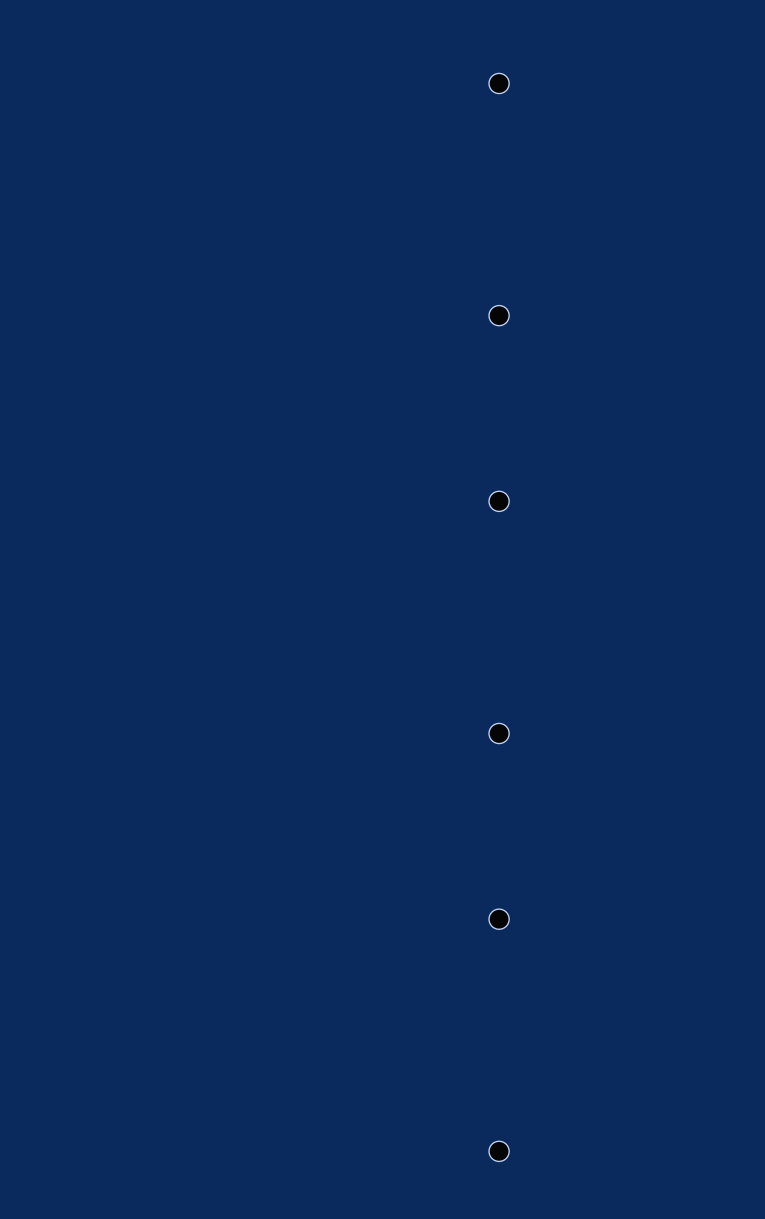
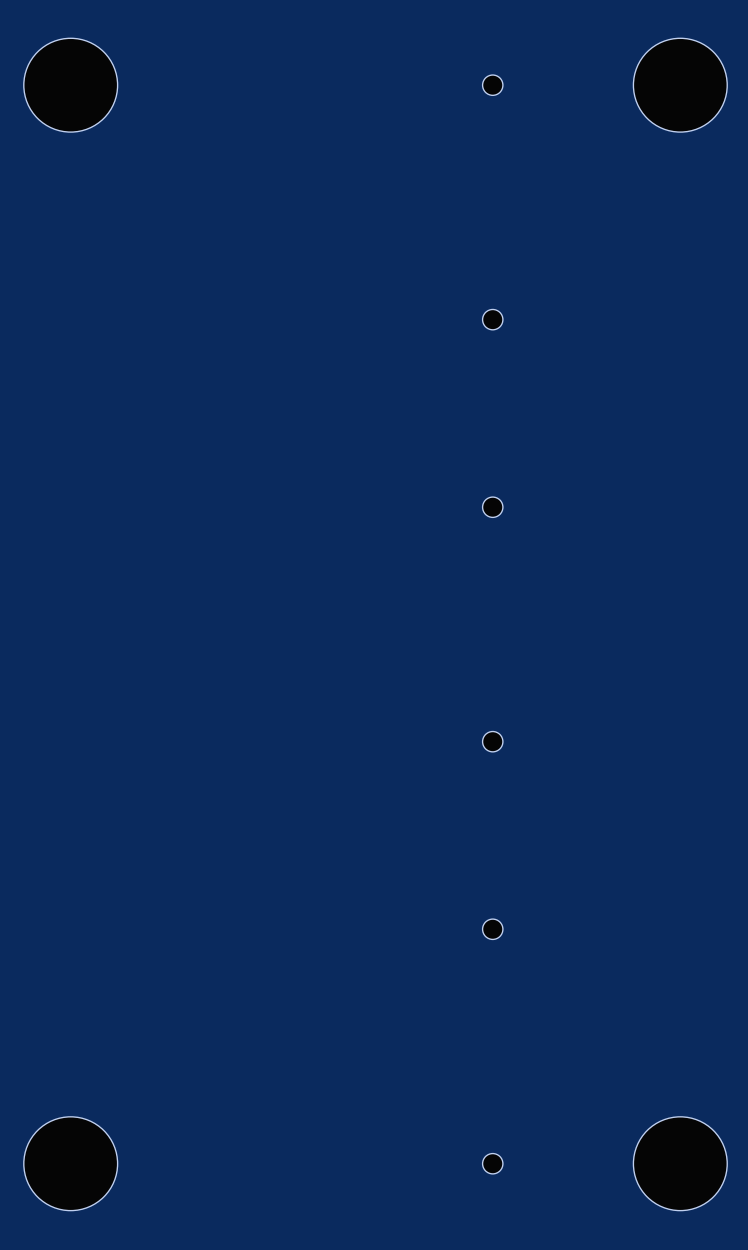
hole: none -> (70, 85)
hole: none -> (680, 85)
hole: none -> (70, 1163)
hole: none -> (680, 1163)

